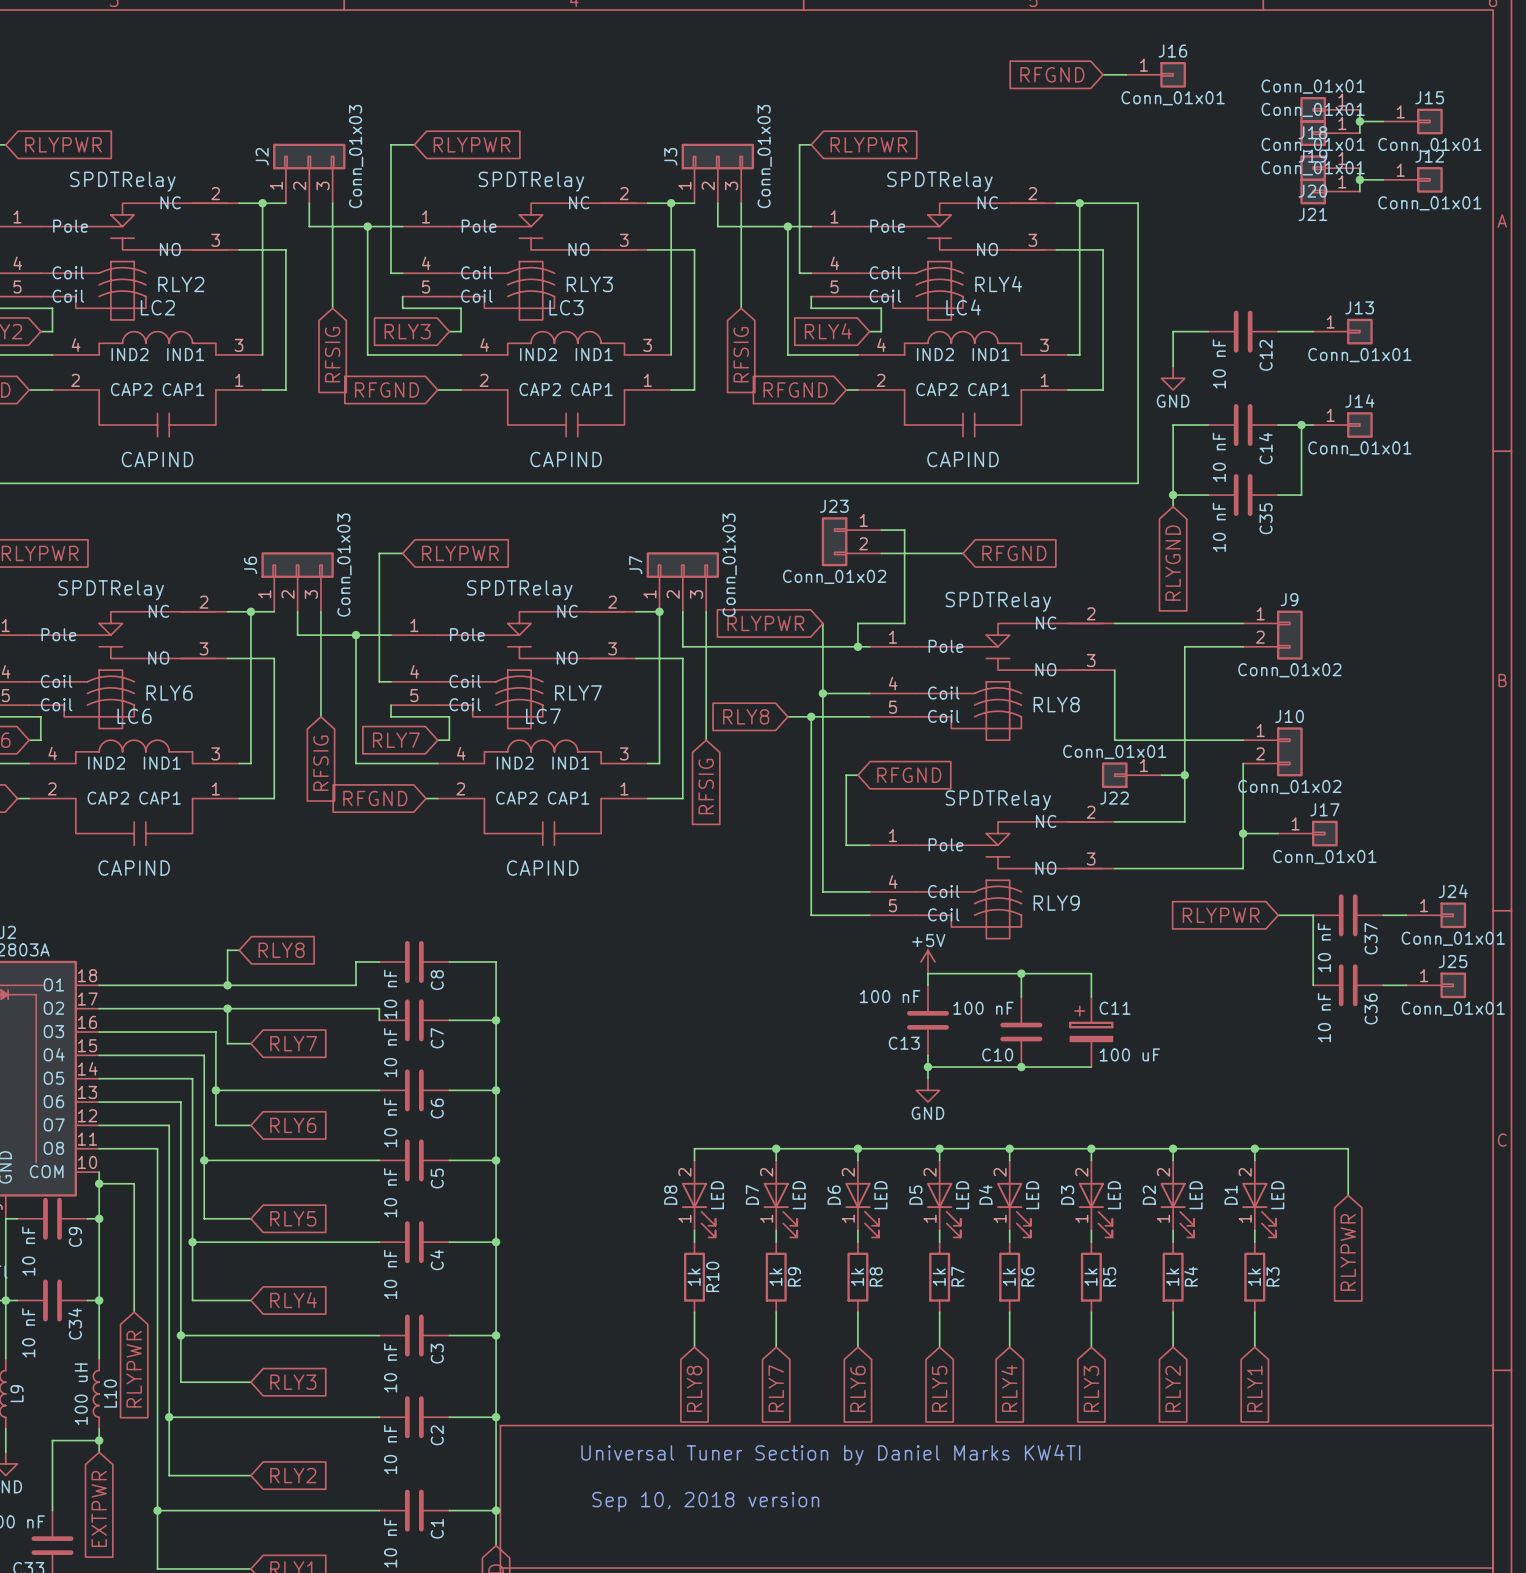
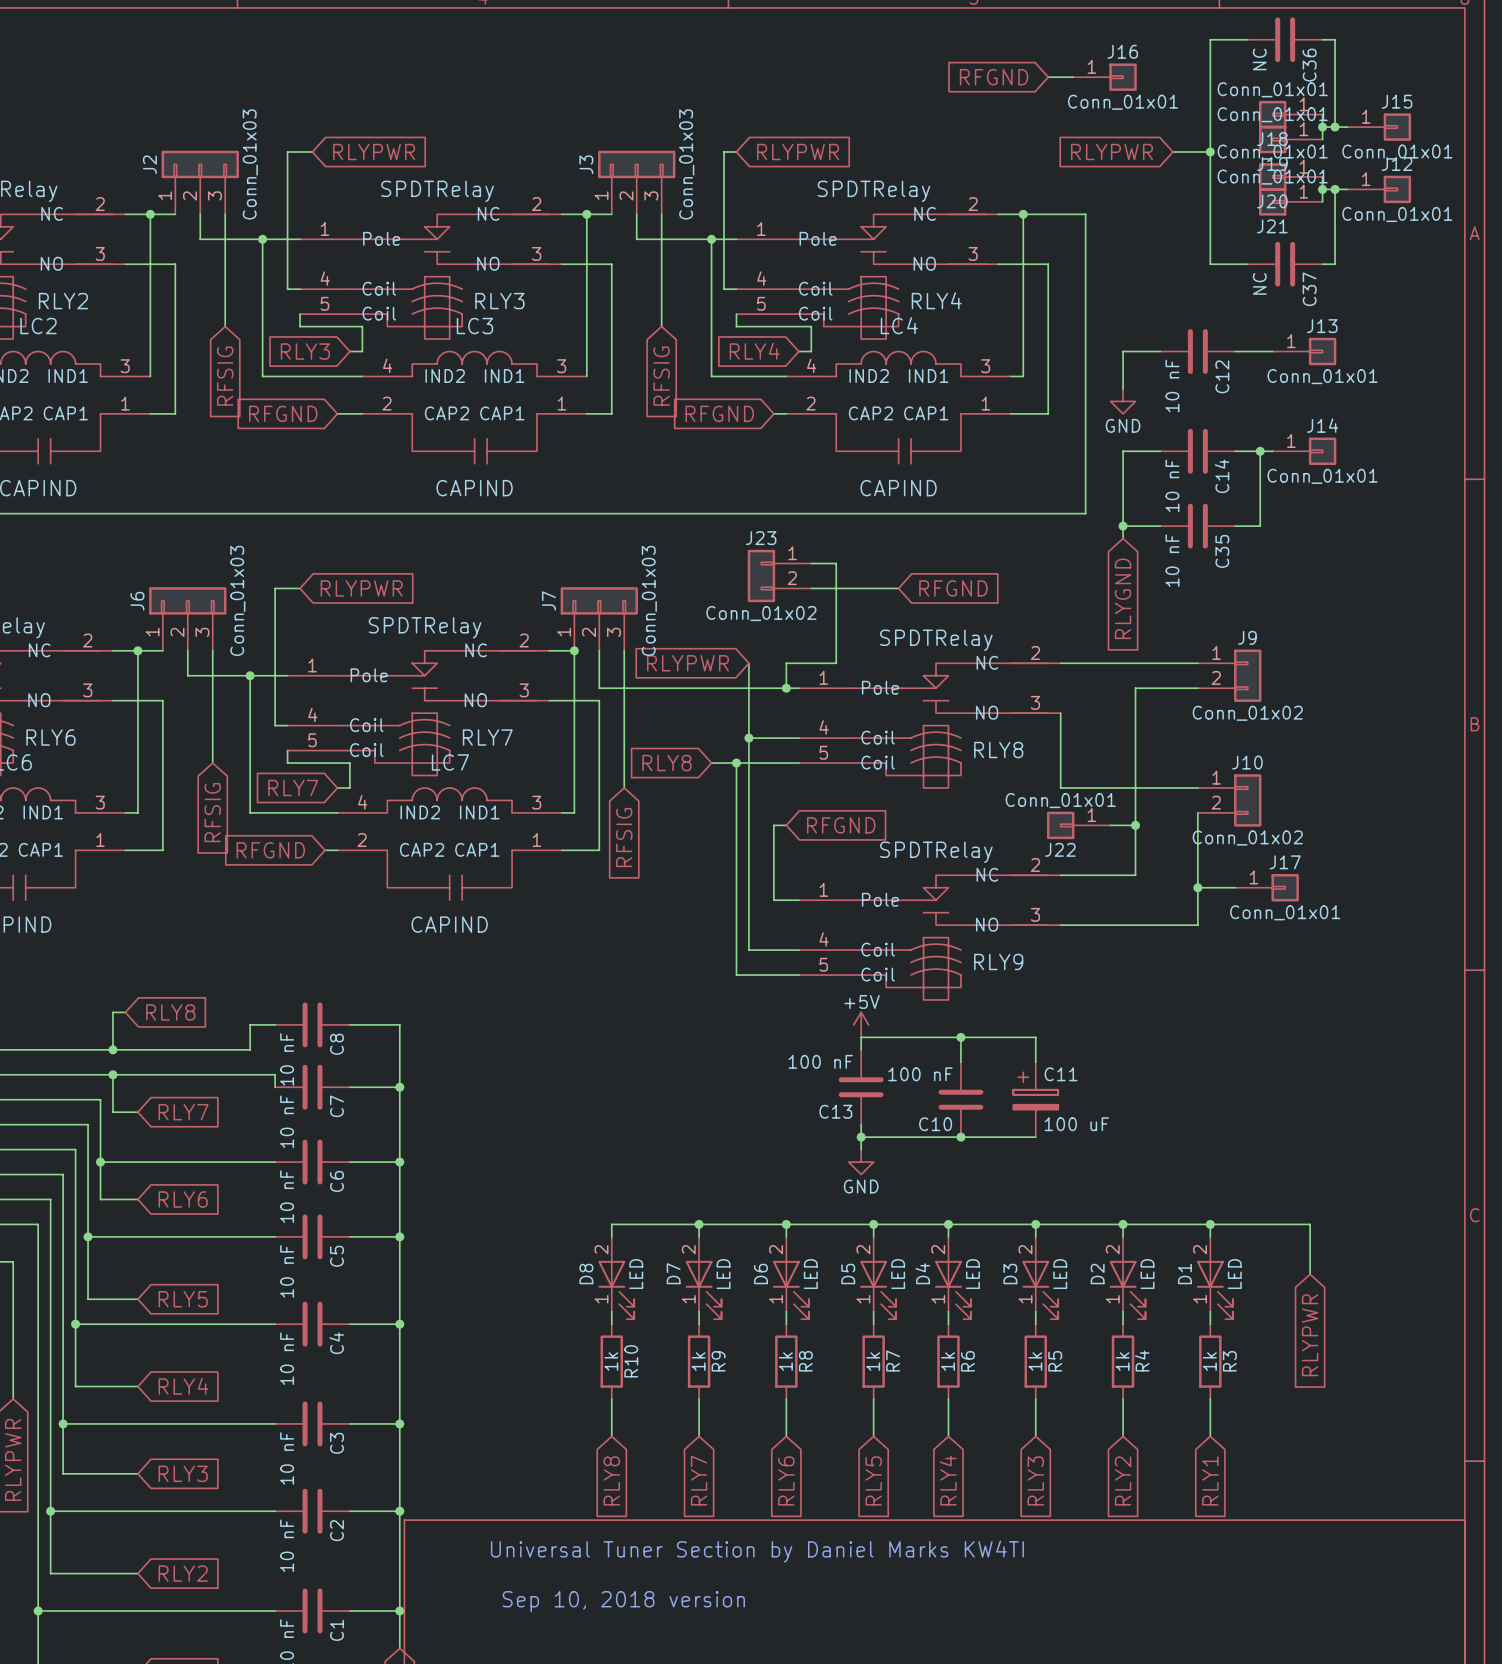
wire: none -> (1247, 39) (1210, 39) (1210, 264) (1247, 264)
wire: none -> (1322, 39) (1335, 39) (1335, 127)
junction: none -> (1335, 127)
global label: none -> RLYPWR (1112, 152)
wire: none -> (1172, 152) (1210, 152)
junction: none -> (1210, 152)
wire: none -> (1335, 189) (1335, 264) (1322, 264)
junction: none -> (1335, 189)
global label: RLYPWR (1221, 915) -> none
wire: (1278, 915) (1313, 915) (1313, 985) -> none
C37 position: (1348, 915) -> (1285, 264)
wire: (1383, 915) (1406, 915) -> none
J24: Conn_01x01 (1436, 915) -> none
C37 value: 10 nF (1324, 947) -> NC (1259, 283)
C36 position: (1348, 985) -> (1285, 39)
wire: (1383, 985) (1406, 985) -> none
J25: Conn_01x01 (1436, 985) -> none
C36 value: 10 nF (1324, 1017) -> NC (1259, 59)

